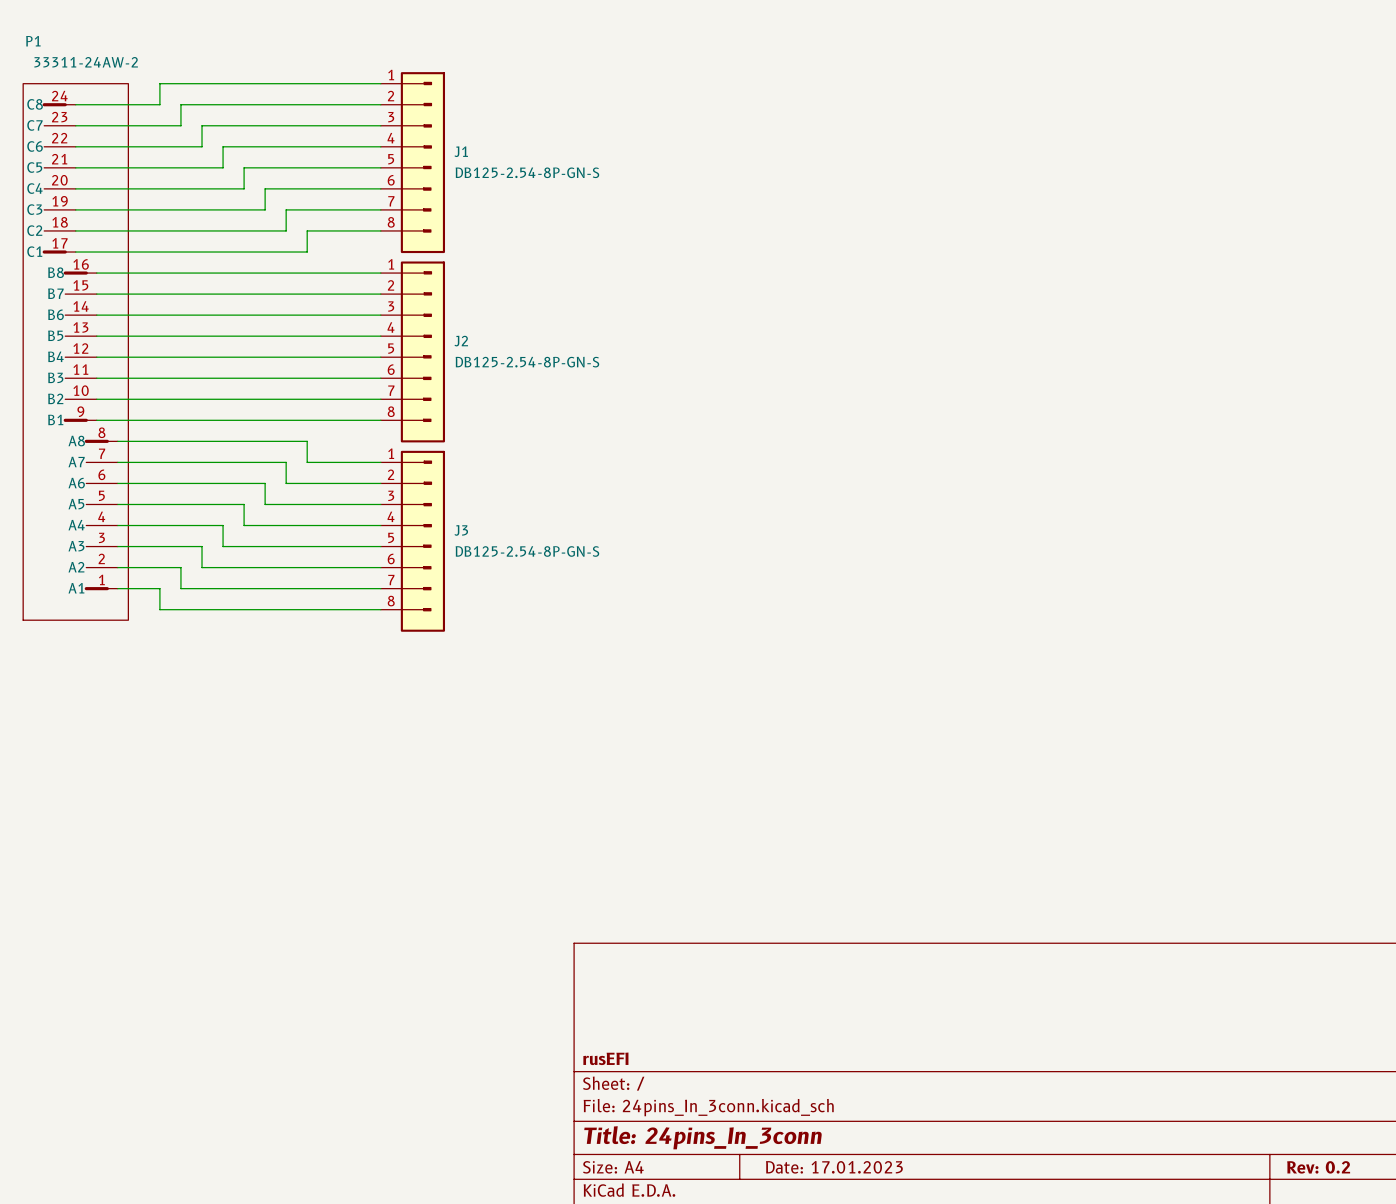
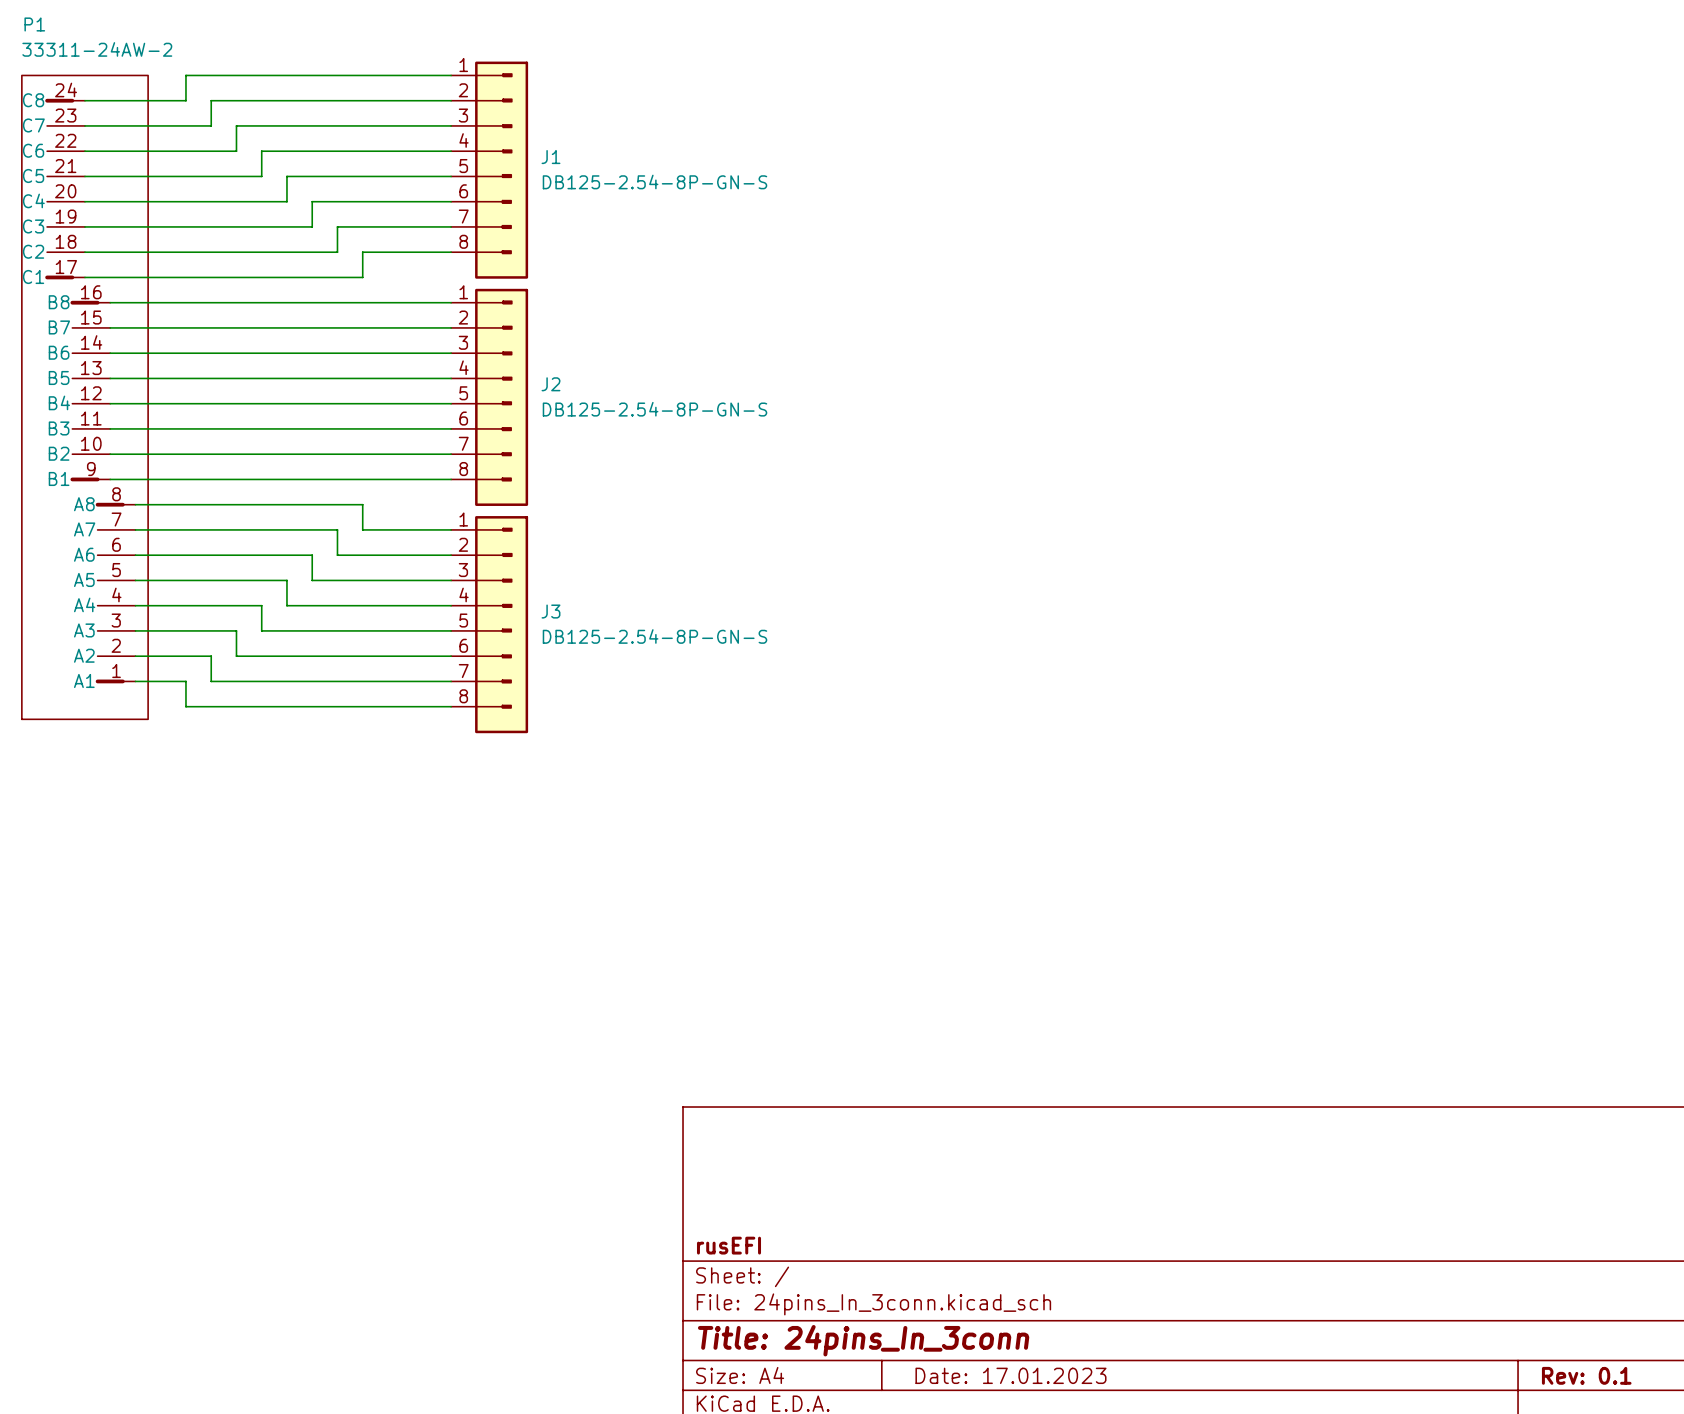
title block: Rev: 0.2 (1318, 1167) -> Rev: 0.1 (1586, 1375)

